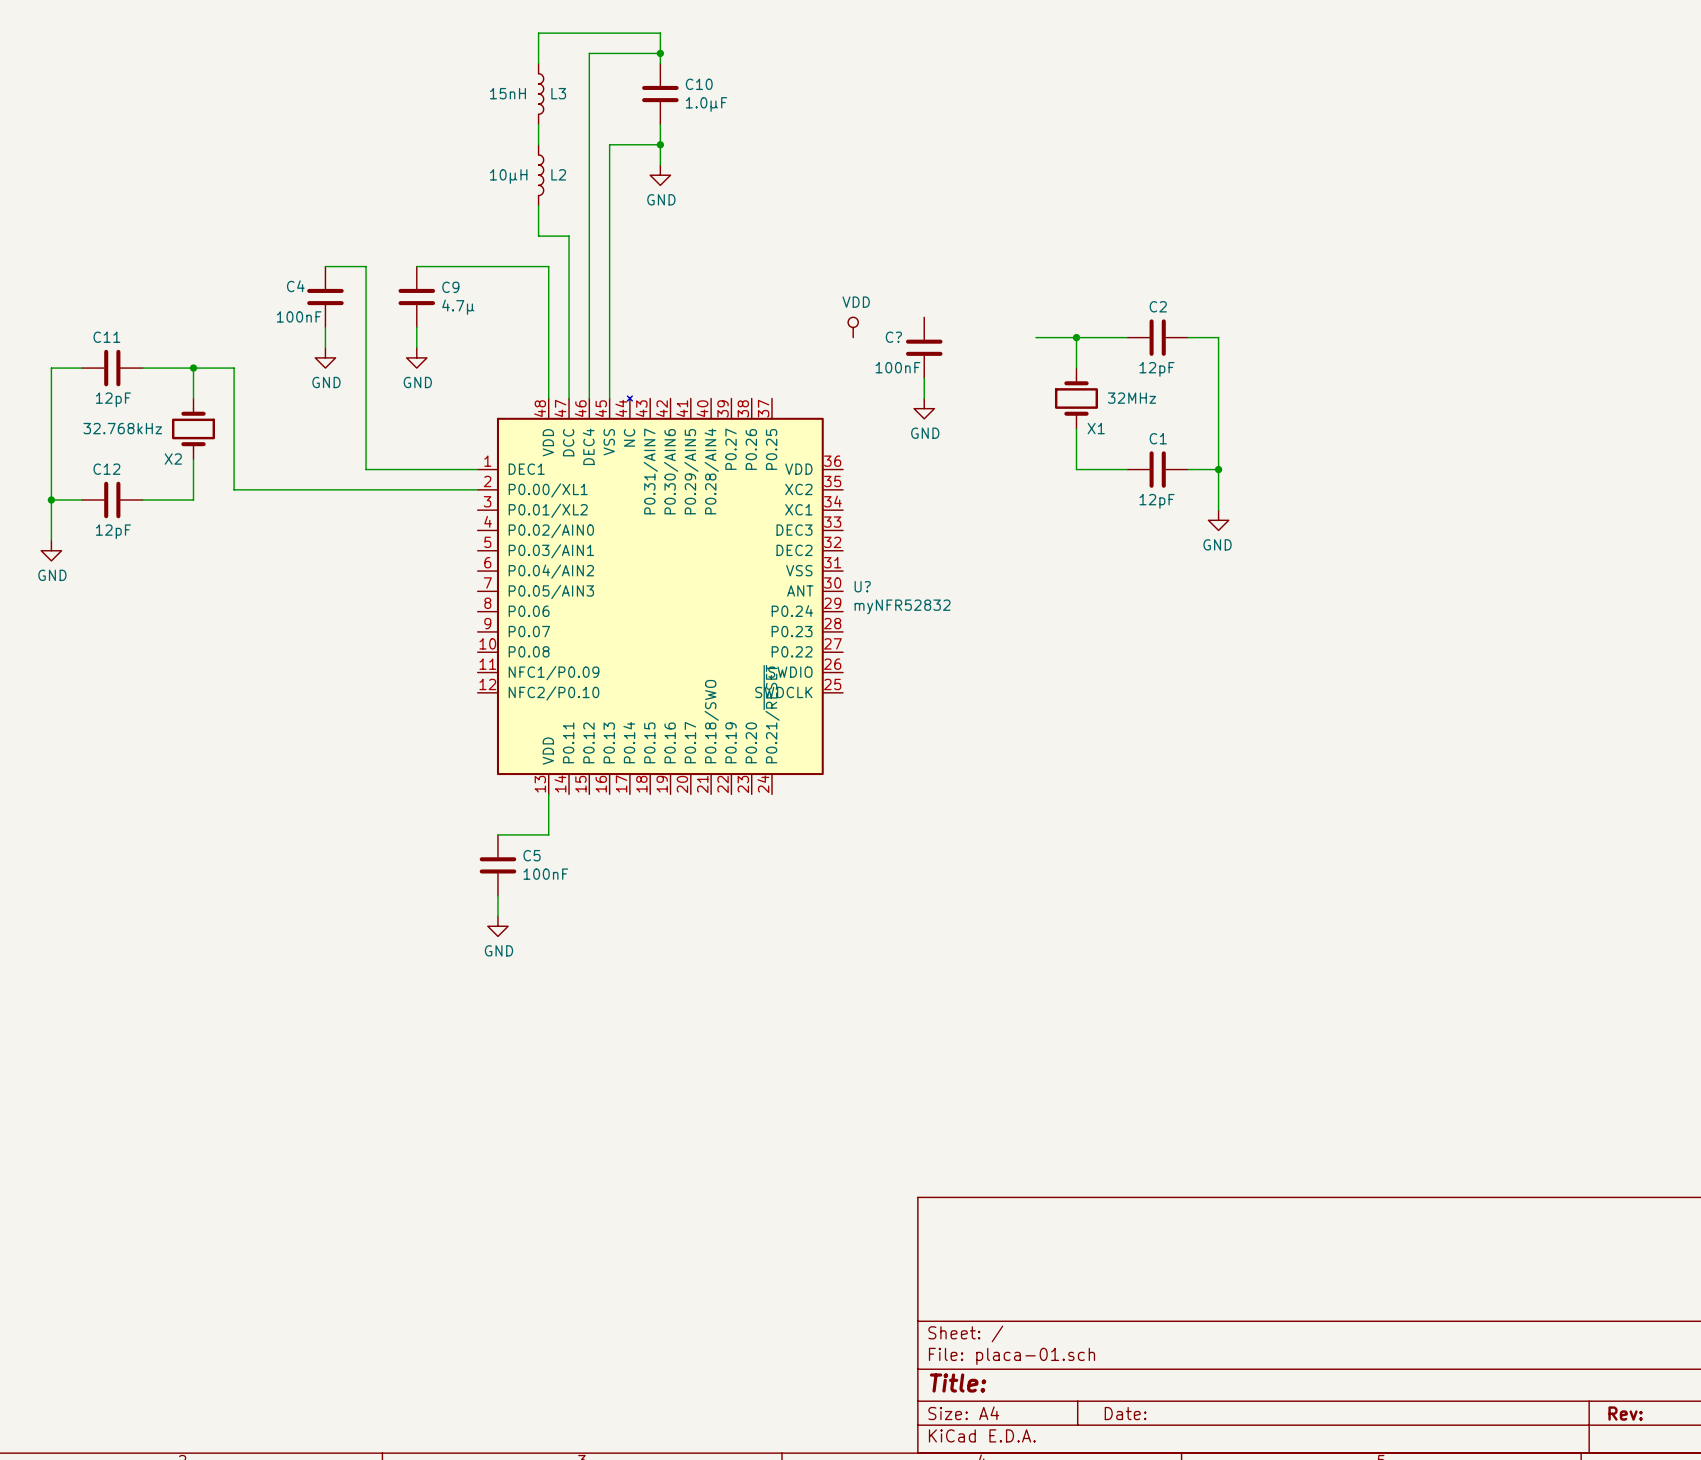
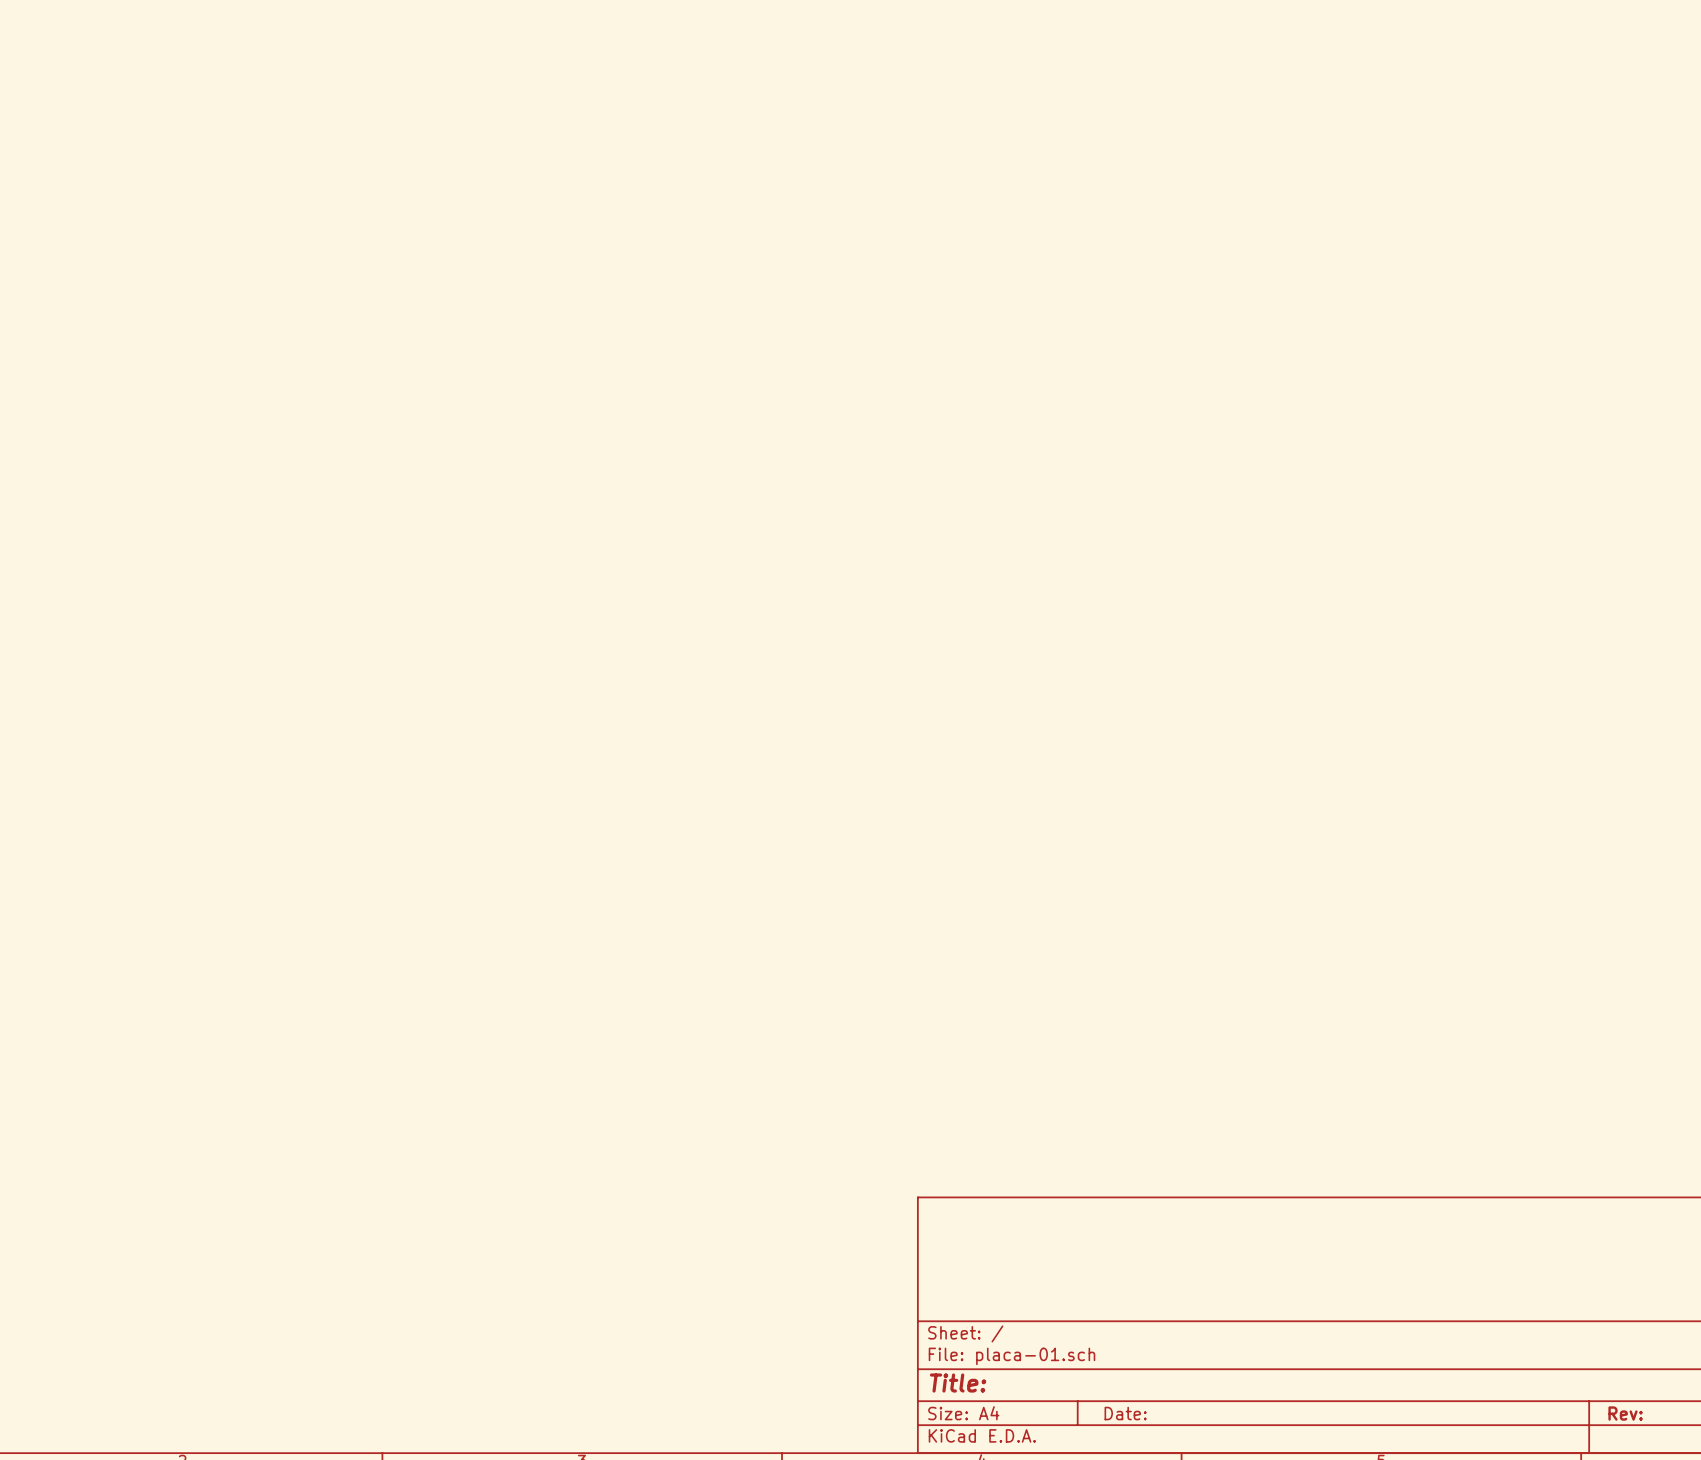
wire: (660, 53) (589, 53) (589, 398) -> none
junction: (660, 53) -> none
wire: (538, 63) (538, 33) (660, 33) (660, 63) -> none
L3: 15nH (541, 94) -> none
C10: 1.0µF (660, 94) -> none
wire: (538, 124) (538, 144) -> none
wire: (660, 124) (660, 165) -> none
wire: (660, 144) (609, 144) (609, 398) -> none
junction: (660, 144) -> none
L2: 10µH (541, 175) -> none
power symbol: GND (660, 175) -> none
wire: (538, 205) (538, 236) (569, 236) (569, 398) -> none
wire: (325, 266) (366, 266) (366, 469) (477, 469) -> none
wire: (416, 266) (548, 266) (548, 398) -> none
C4: 100nF (325, 297) -> none
C9: 4.7µ (416, 297) -> none
wire: (325, 327) (325, 347) -> none
wire: (416, 327) (416, 347) -> none
power symbol: VDD (853, 327) -> none
wire: (1035, 337) (1127, 337) -> none
wire: (1076, 337) (1076, 368) -> none
junction: (1076, 337) -> none
C2: 12pF (1157, 337) -> none
wire: (1188, 337) (1218, 337) (1218, 510) -> none
C?: 100nF (924, 347) -> none
power symbol: GND (325, 357) -> none
power symbol: GND (416, 357) -> none
wire: (81, 368) (51, 368) (51, 540) -> none
C11: 12pF (112, 368) -> none
wire: (142, 368) (234, 368) (234, 489) (477, 489) -> none
wire: (193, 368) (193, 398) -> none
junction: (193, 368) -> none
wire: (924, 378) (924, 398) -> none
X1: 32MHz (1076, 398) -> none
power symbol: GND (924, 408) -> none
X2: 32.768kHz (193, 428) -> none
wire: (1076, 428) (1076, 469) (1127, 469) -> none
wire: (193, 459) (193, 500) (142, 500) -> none
C1: 12pF (1157, 469) -> none
wire: (1188, 469) (1218, 469) -> none
junction: (1218, 469) -> none
wire: (51, 500) (81, 500) -> none
junction: (51, 500) -> none
C12: 12pF (112, 500) -> none
power symbol: GND (1218, 520) -> none
power symbol: GND (51, 550) -> none
U?: myNFR52832 (660, 595) -> none
wire: (548, 794) (548, 834) (497, 834) -> none
C5: 100nF (497, 865) -> none
wire: (497, 895) (497, 916) -> none
power symbol: GND (497, 926) -> none

